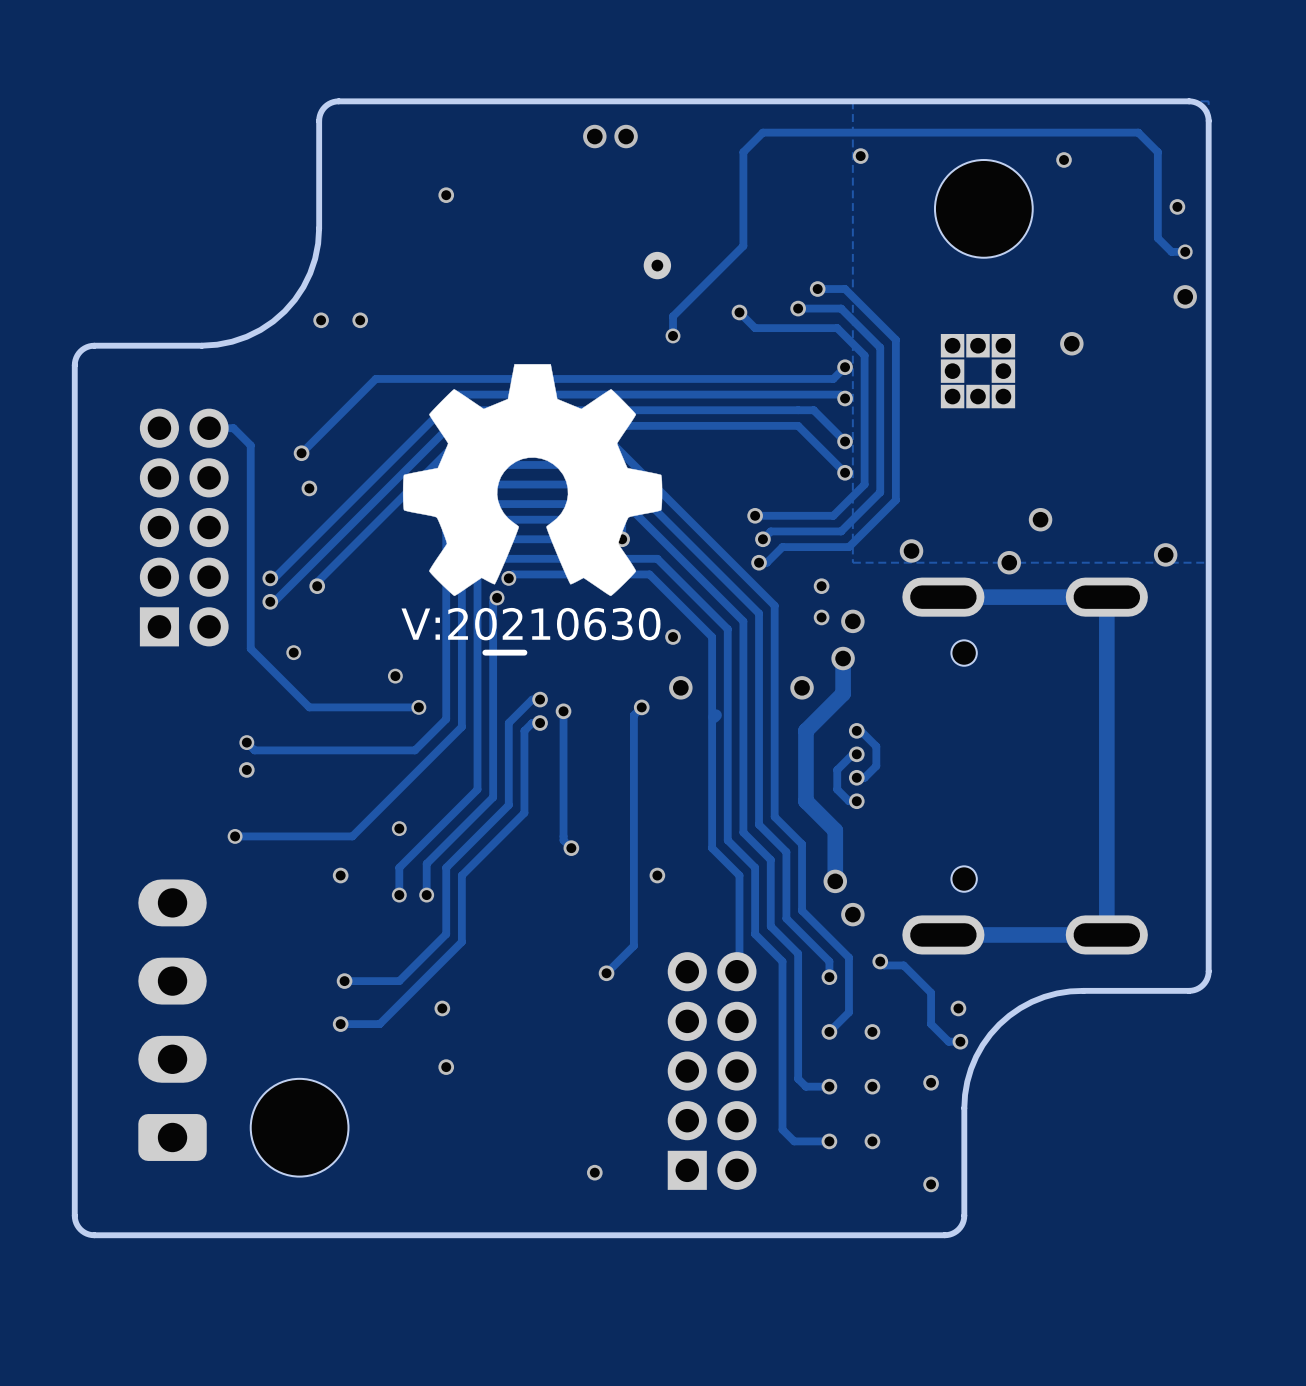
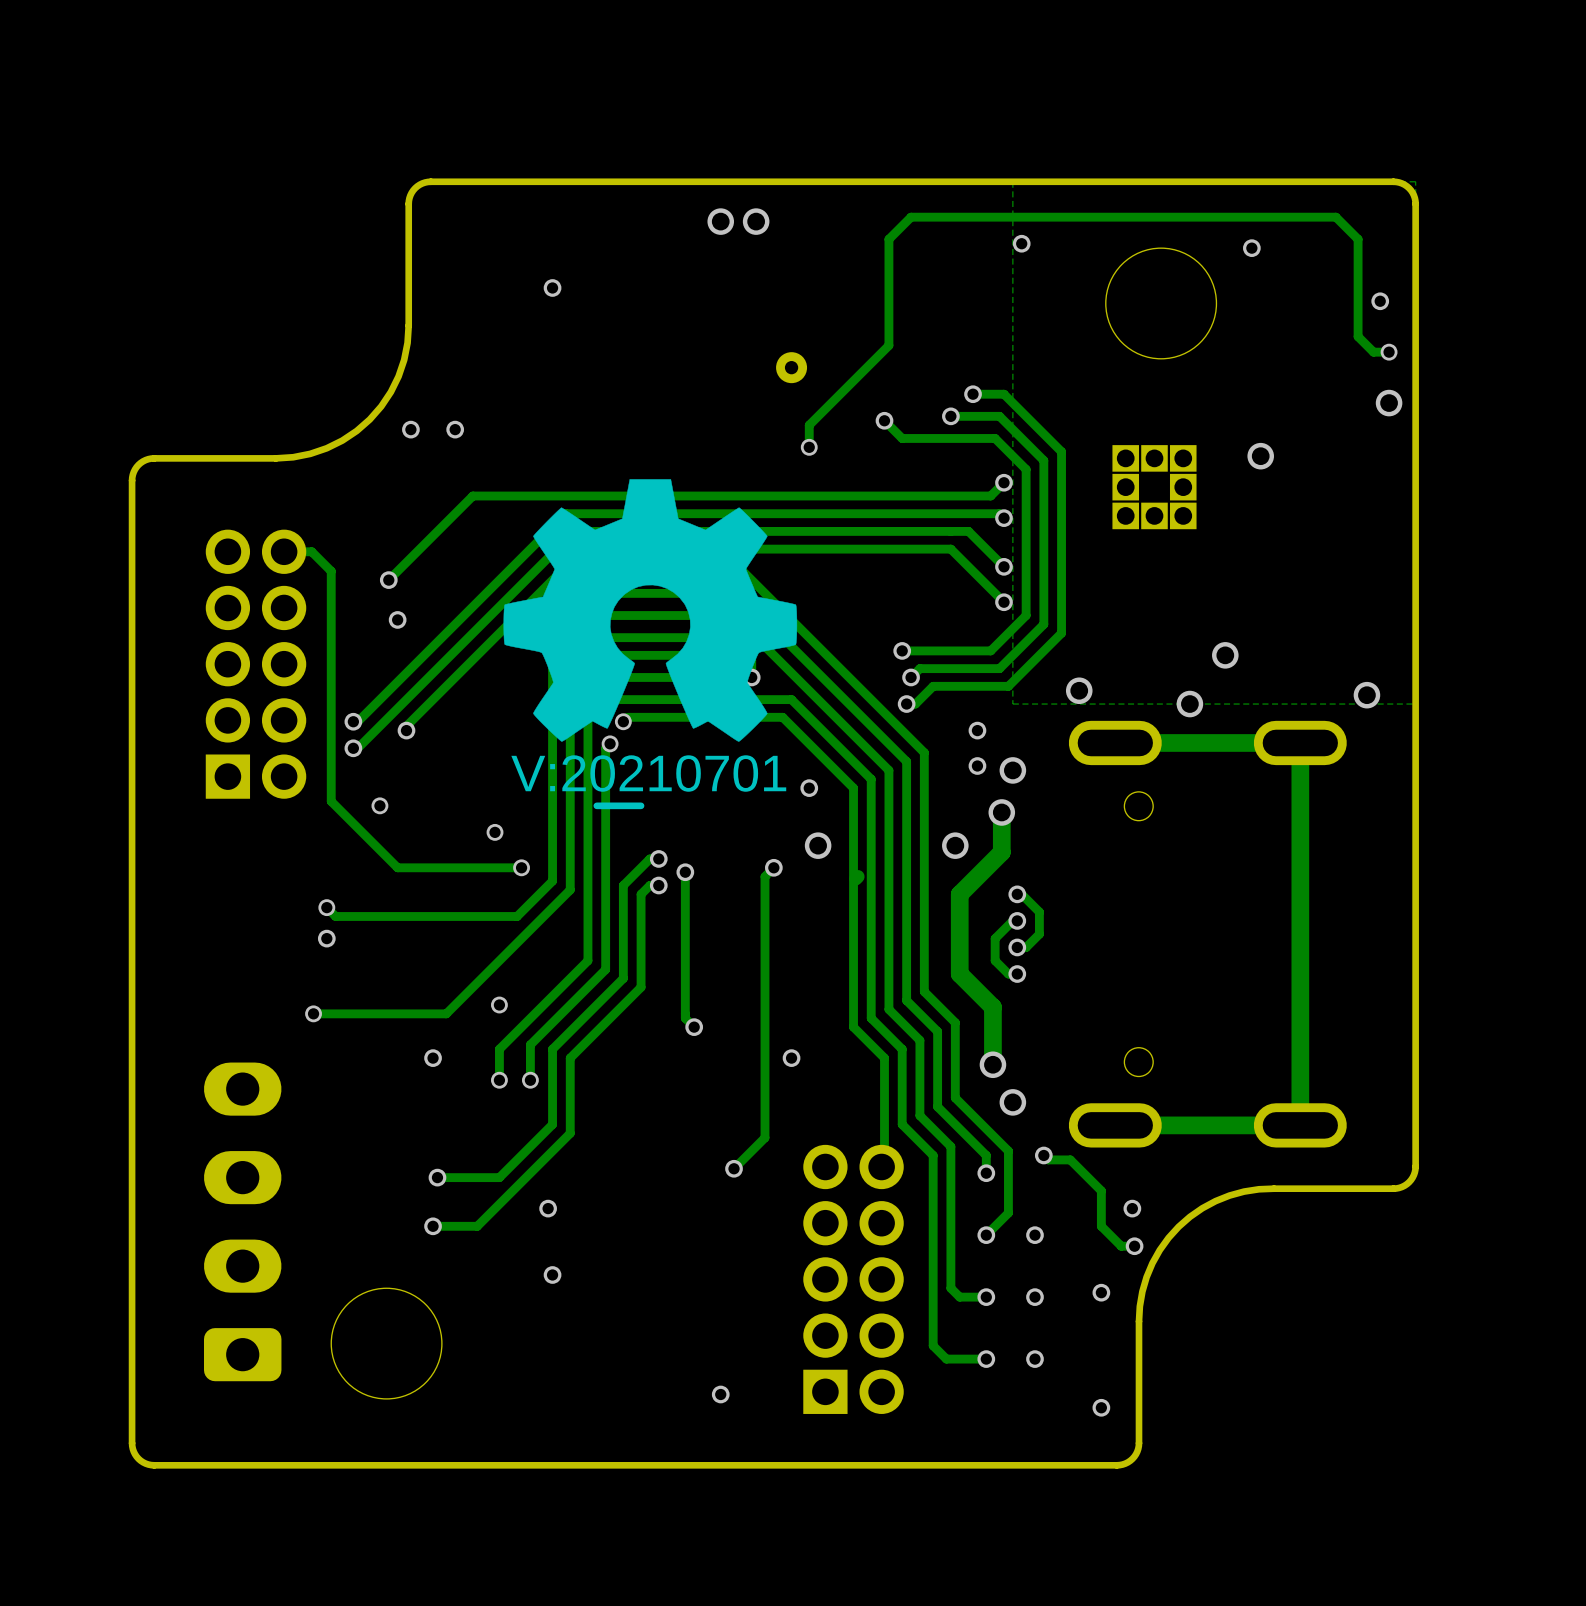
drawing shape: [401, 607, 661, 656] -> [511, 755, 787, 810]

